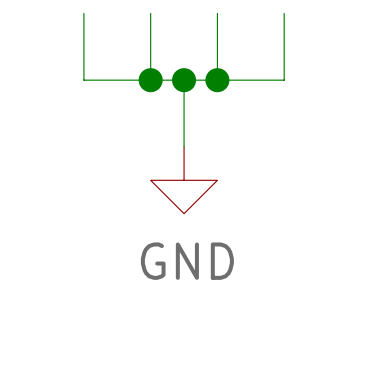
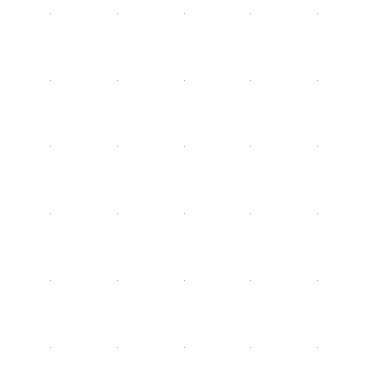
wire: (83, 13) (83, 80) (284, 80) (284, 13) -> none
wire: (150, 13) (150, 80) -> none
wire: (217, 13) (217, 80) -> none
junction: (150, 80) -> none
wire: (184, 80) (184, 146) -> none
junction: (184, 80) -> none
junction: (217, 80) -> none
power symbol: GND (184, 180) -> none

